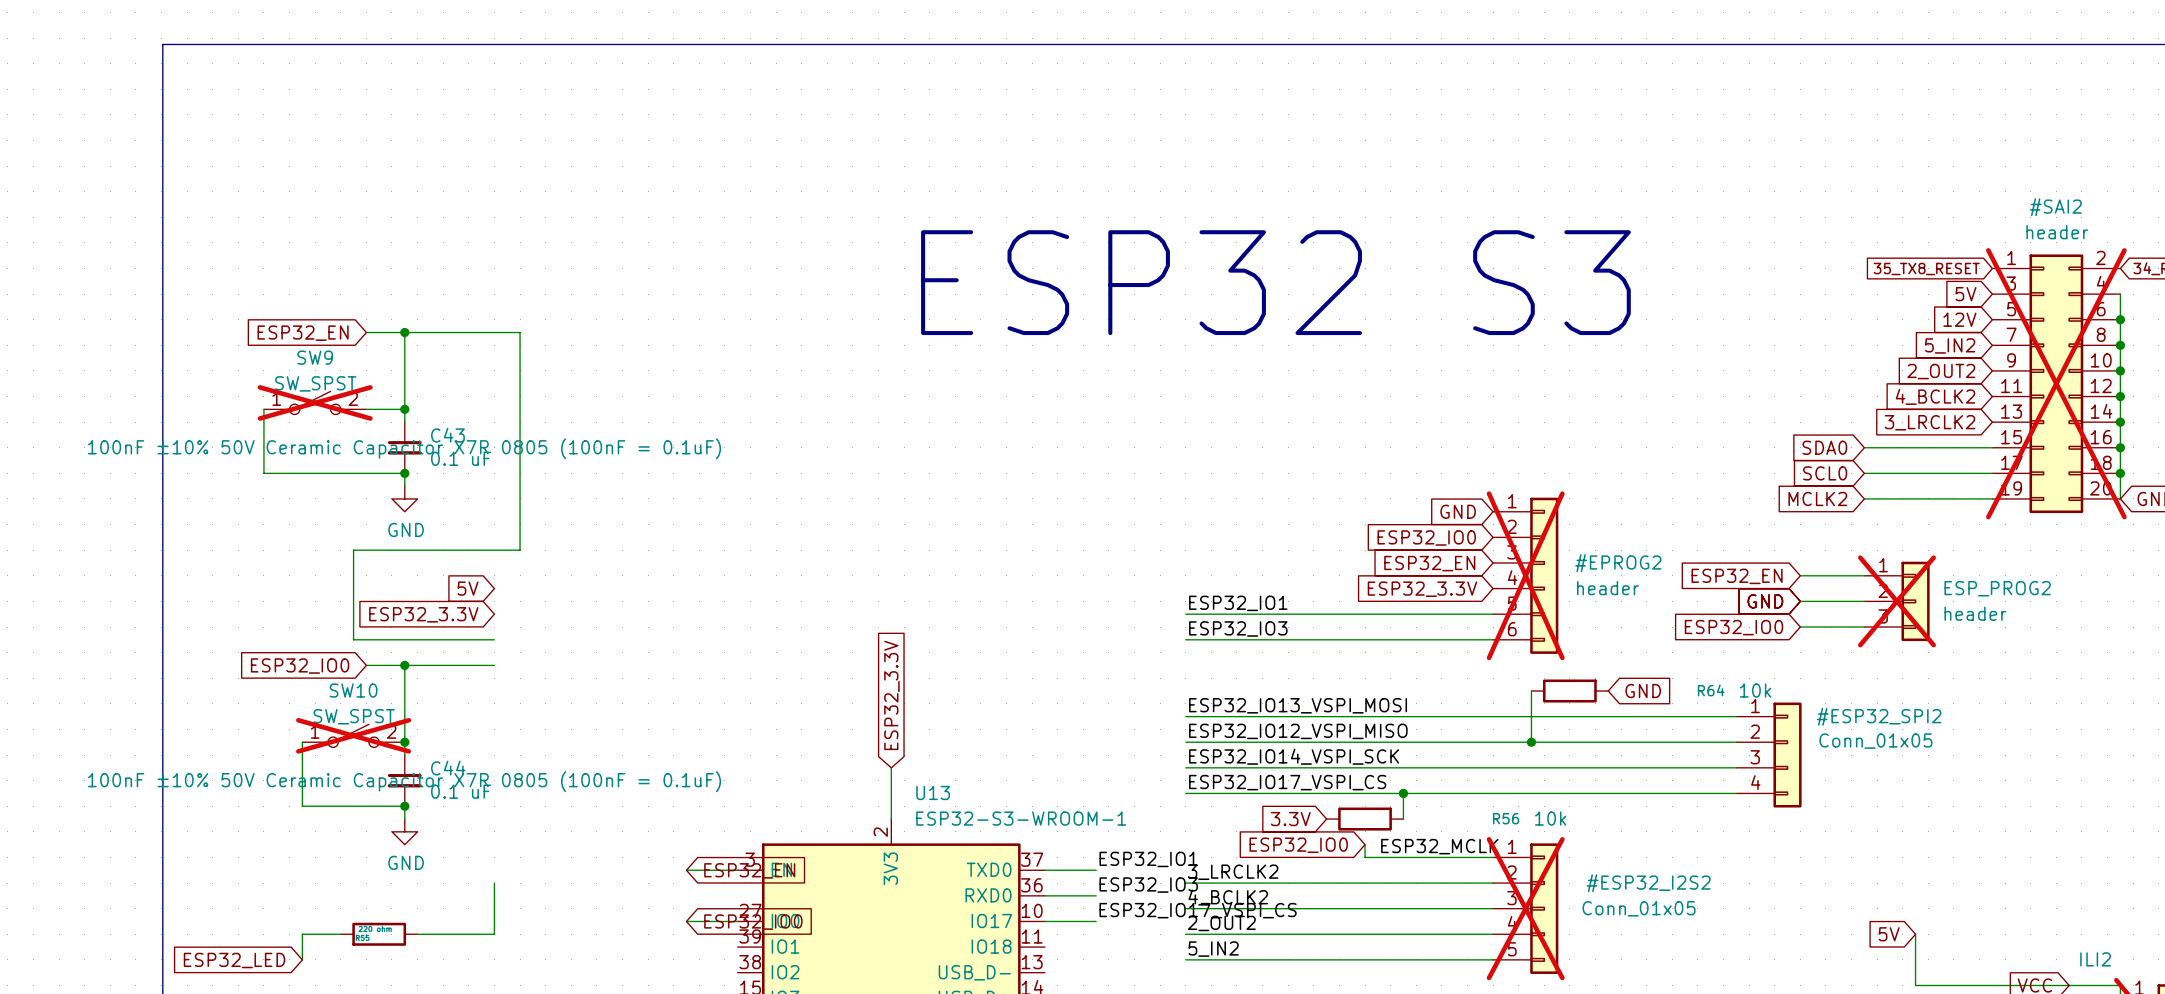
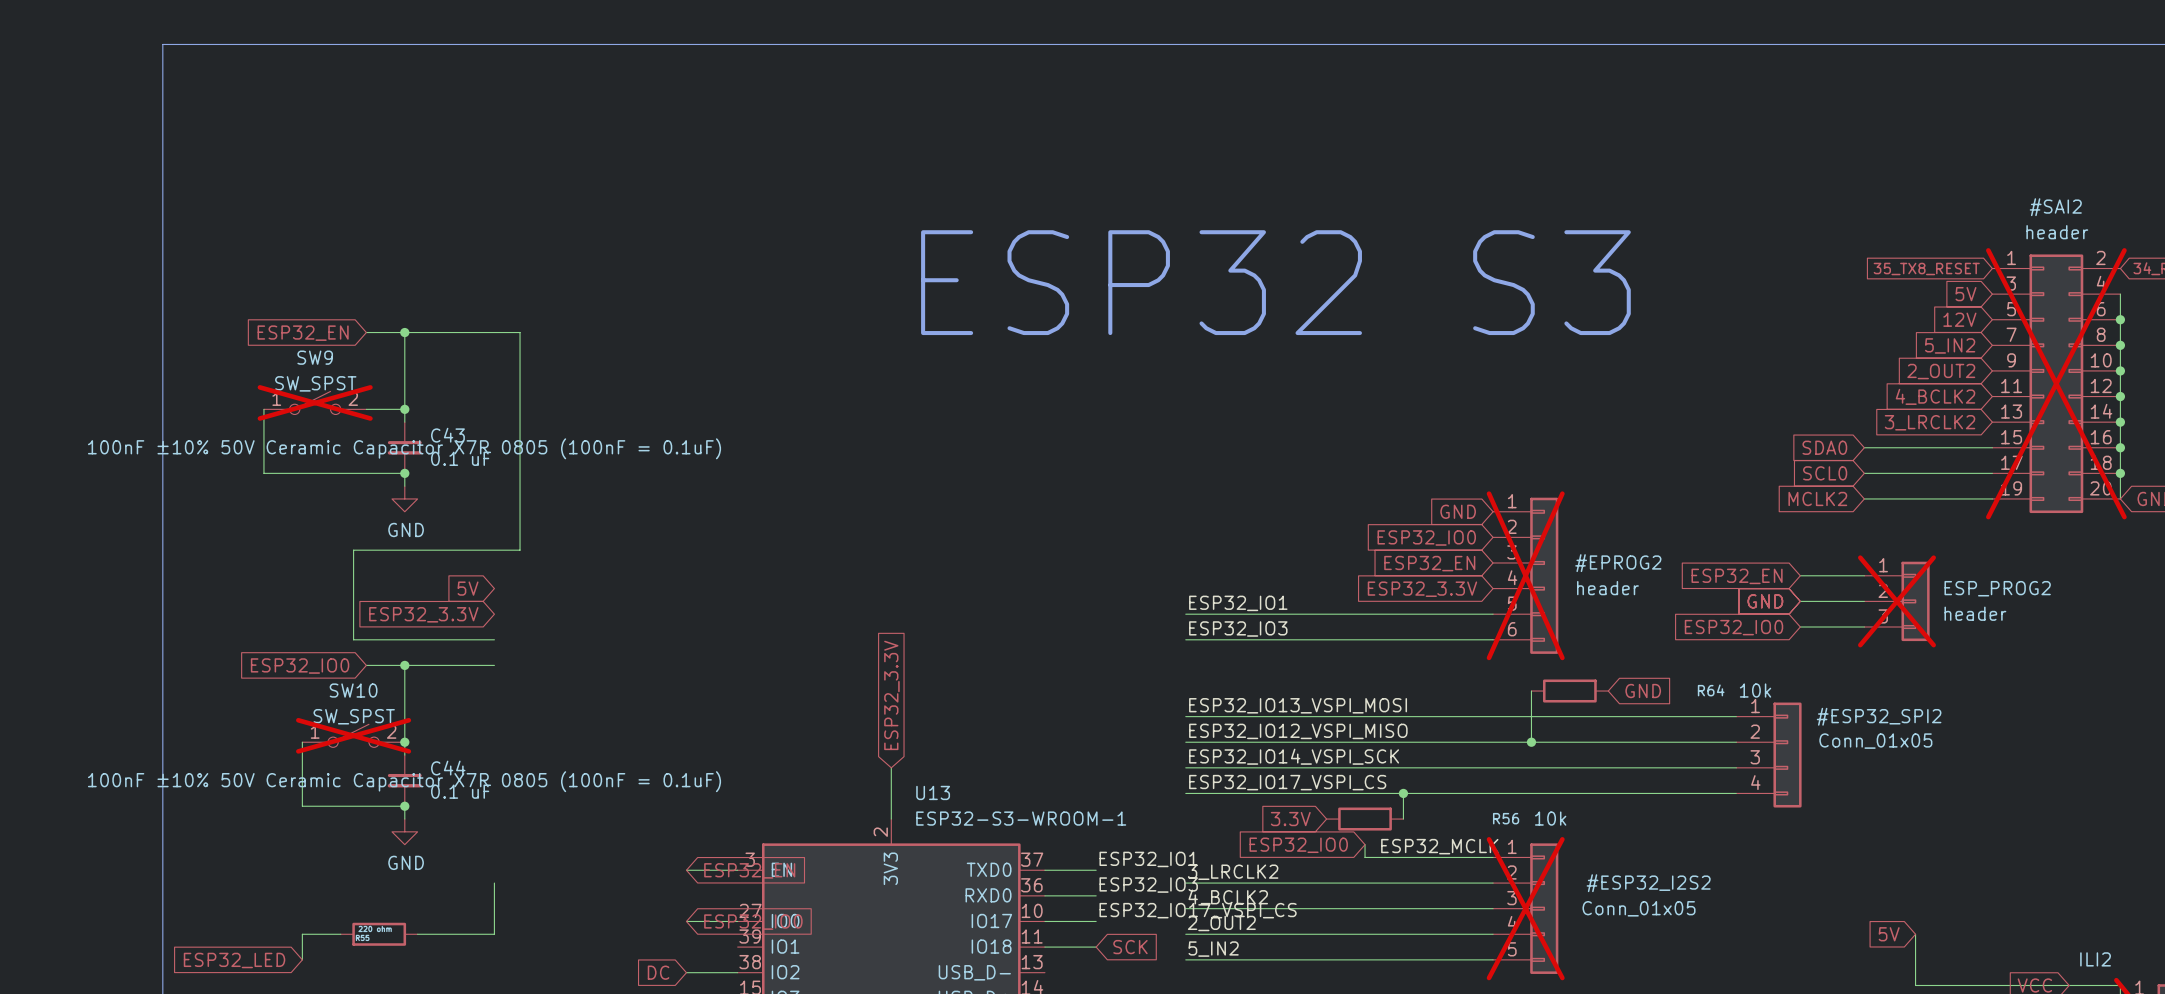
wire: none -> (1044, 947) (1096, 947)
global label: none -> SCK (1130, 947)
global label: none -> DC (658, 972)
wire: none -> (686, 972) (737, 972)

